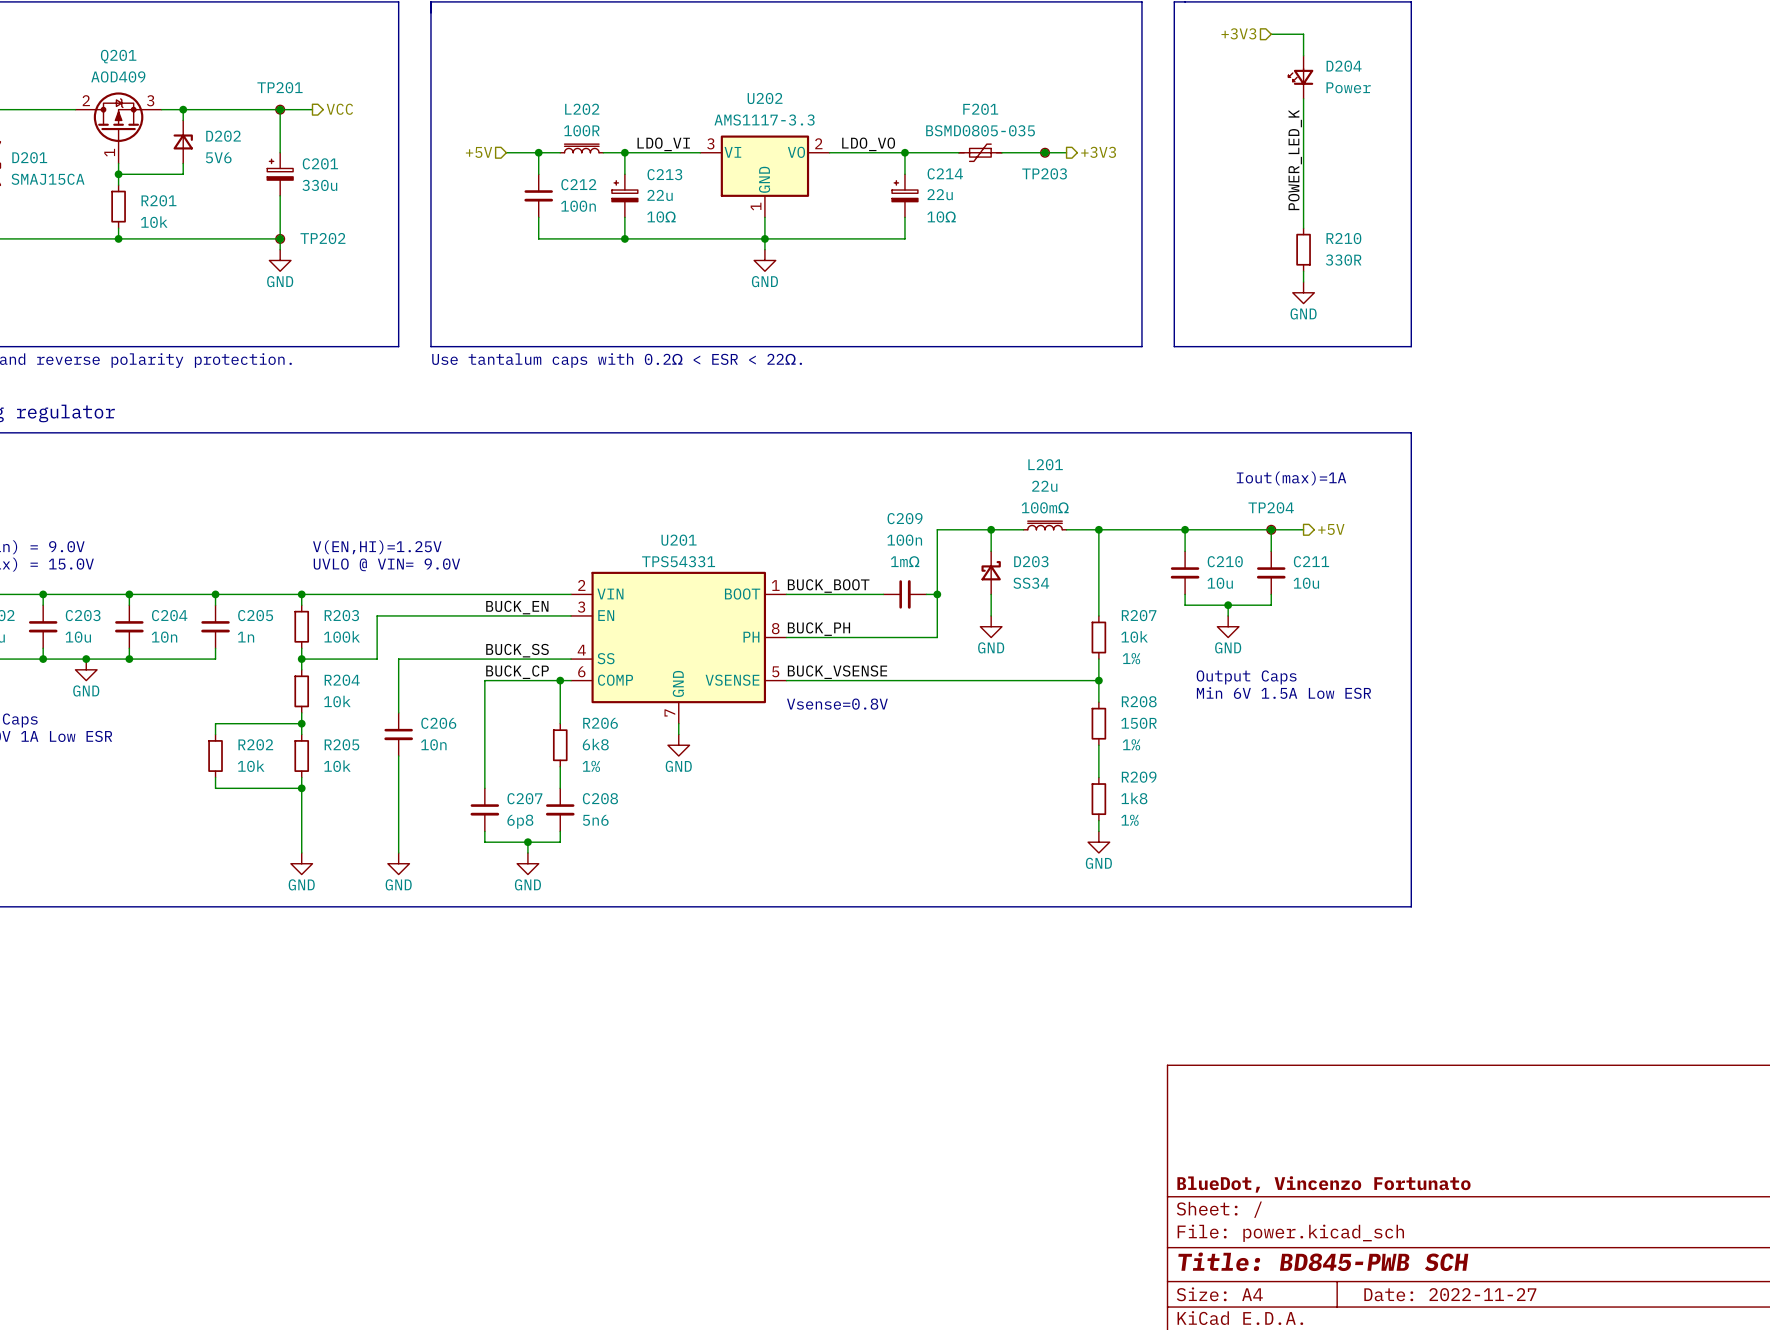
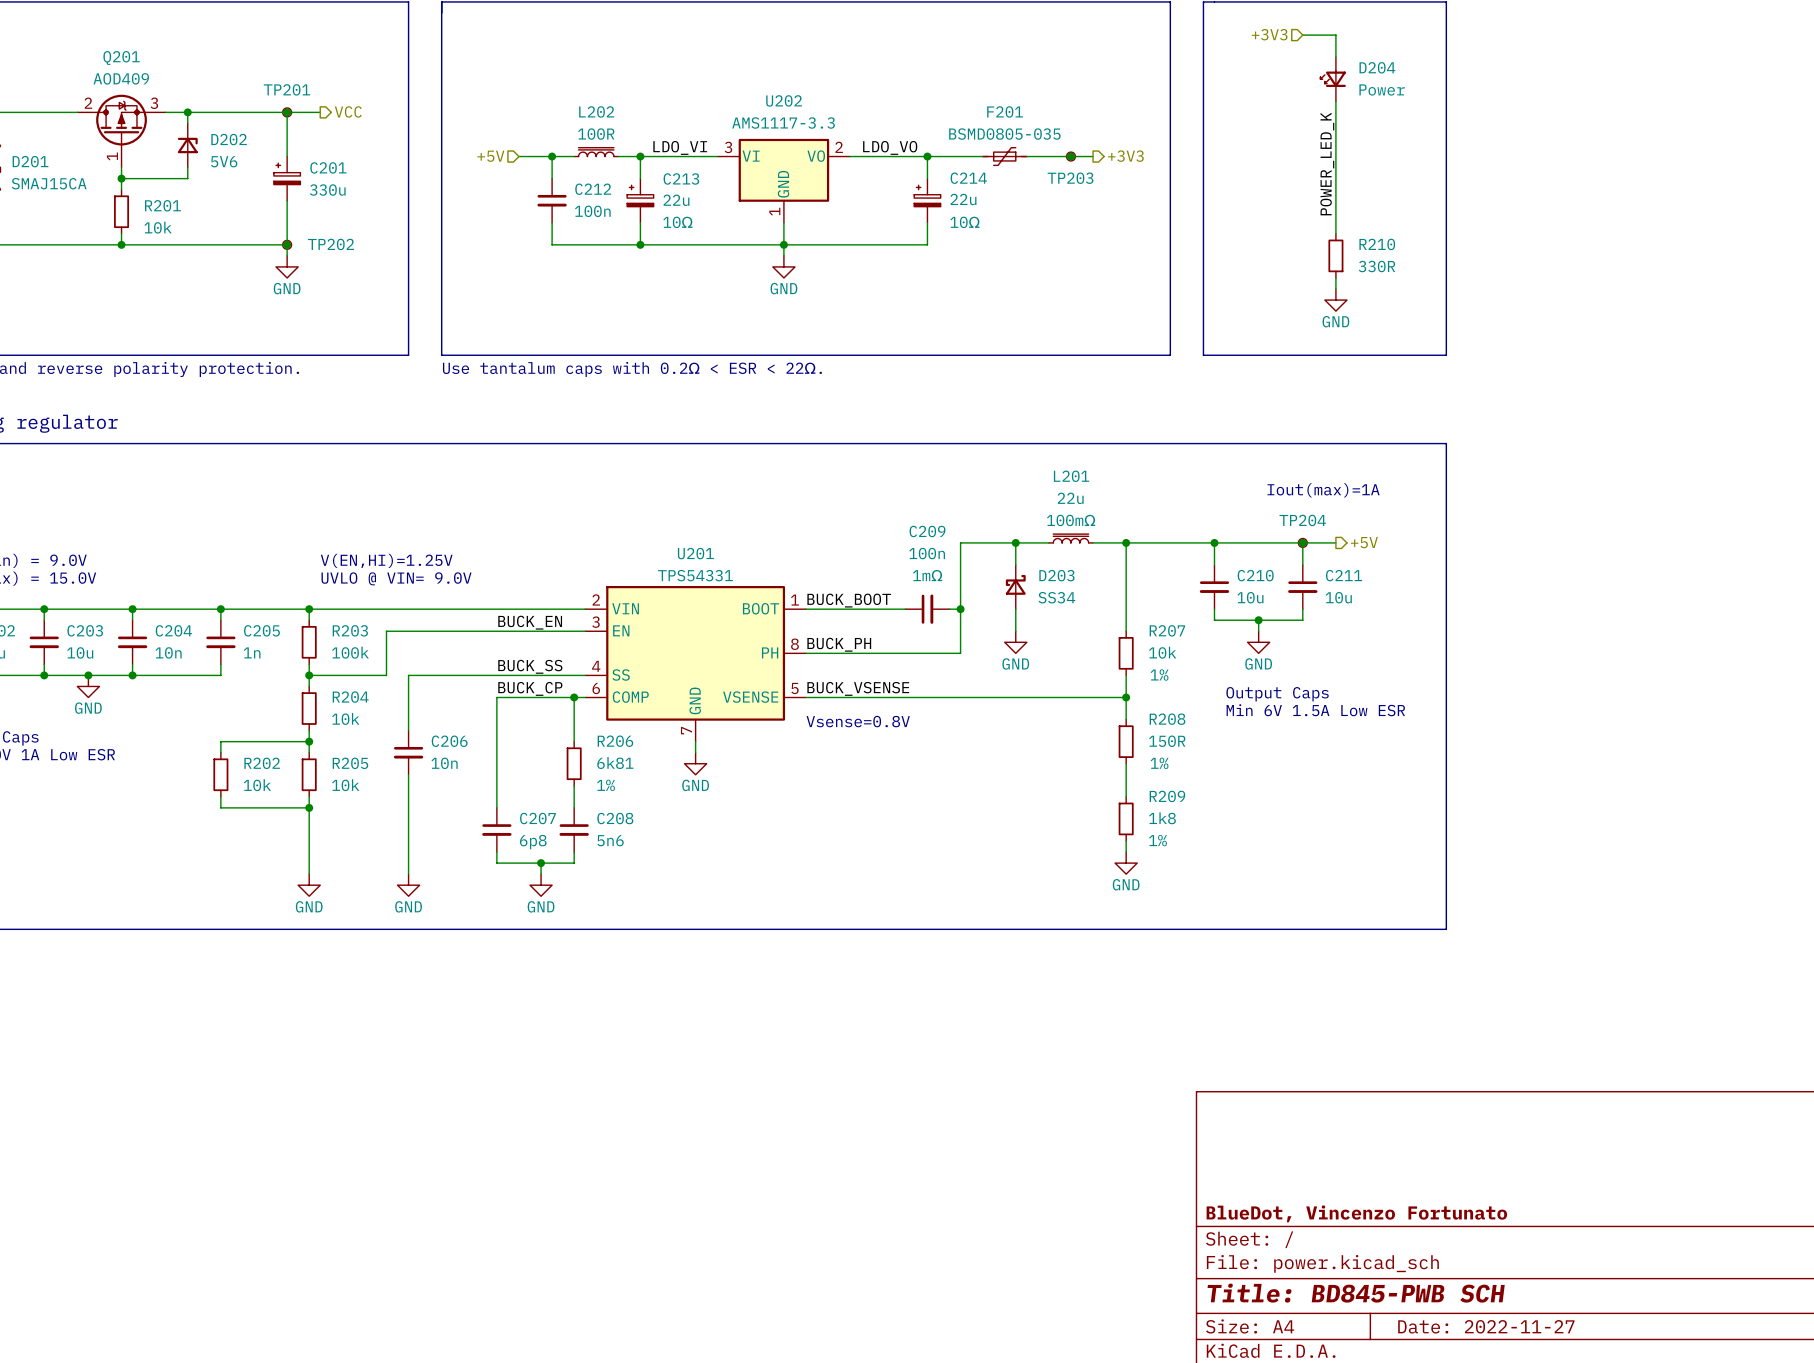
R206 value: 6k8 (595, 744) -> 6k81 (615, 763)

